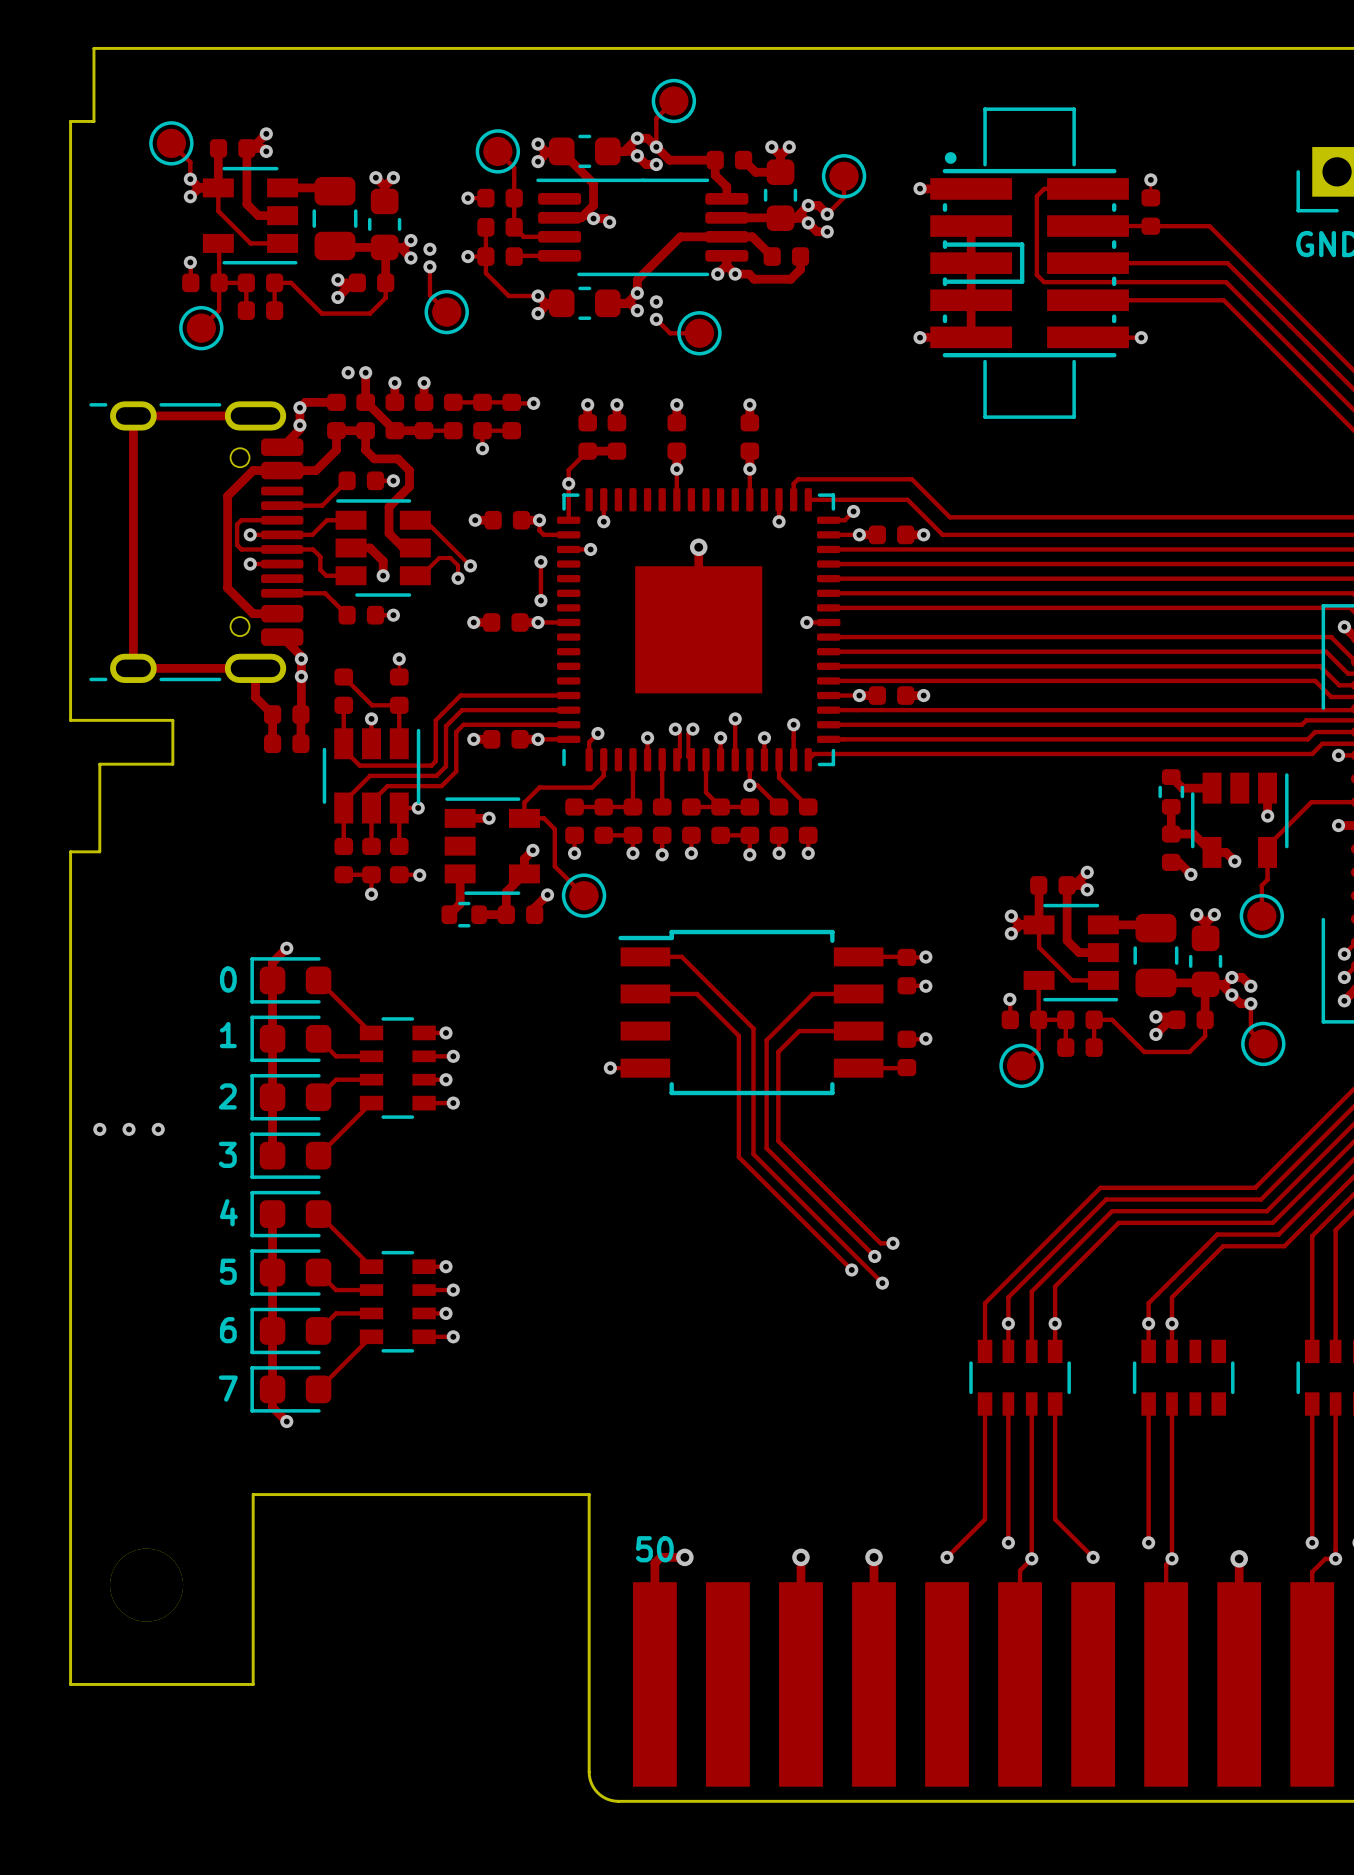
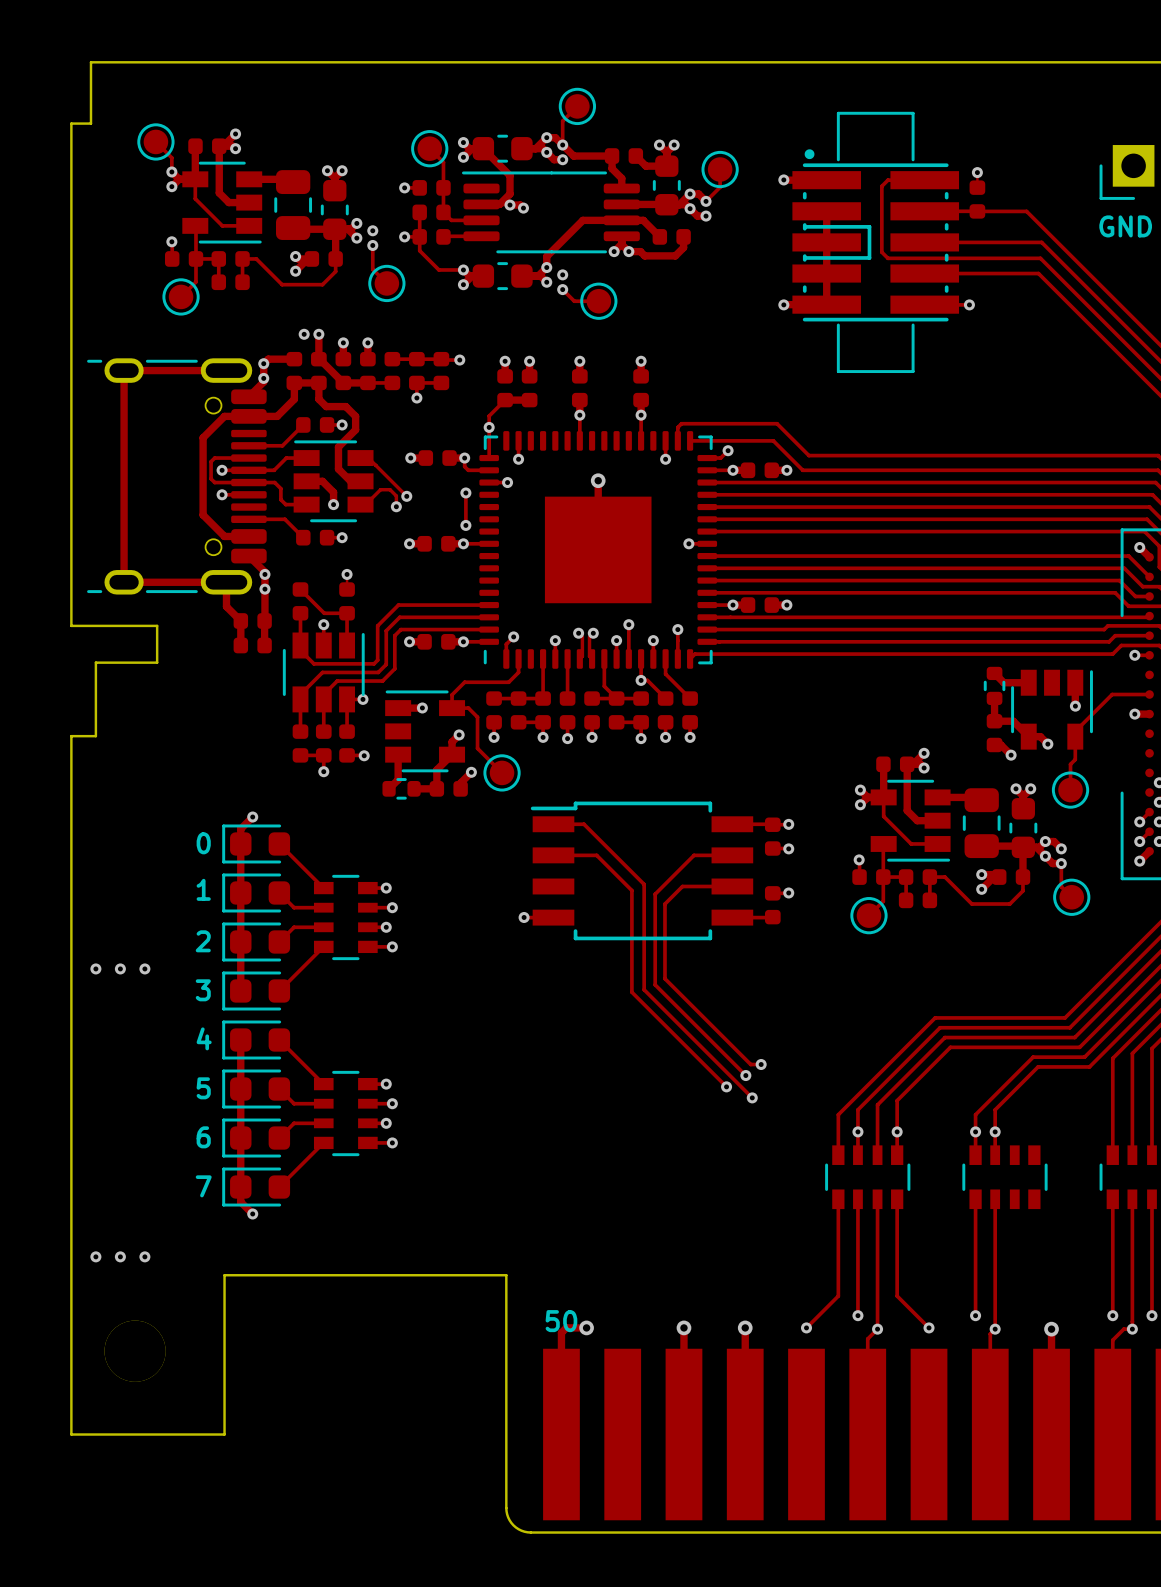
via: none -> (95, 1256)
via: none -> (120, 1256)
via: none -> (144, 1256)

